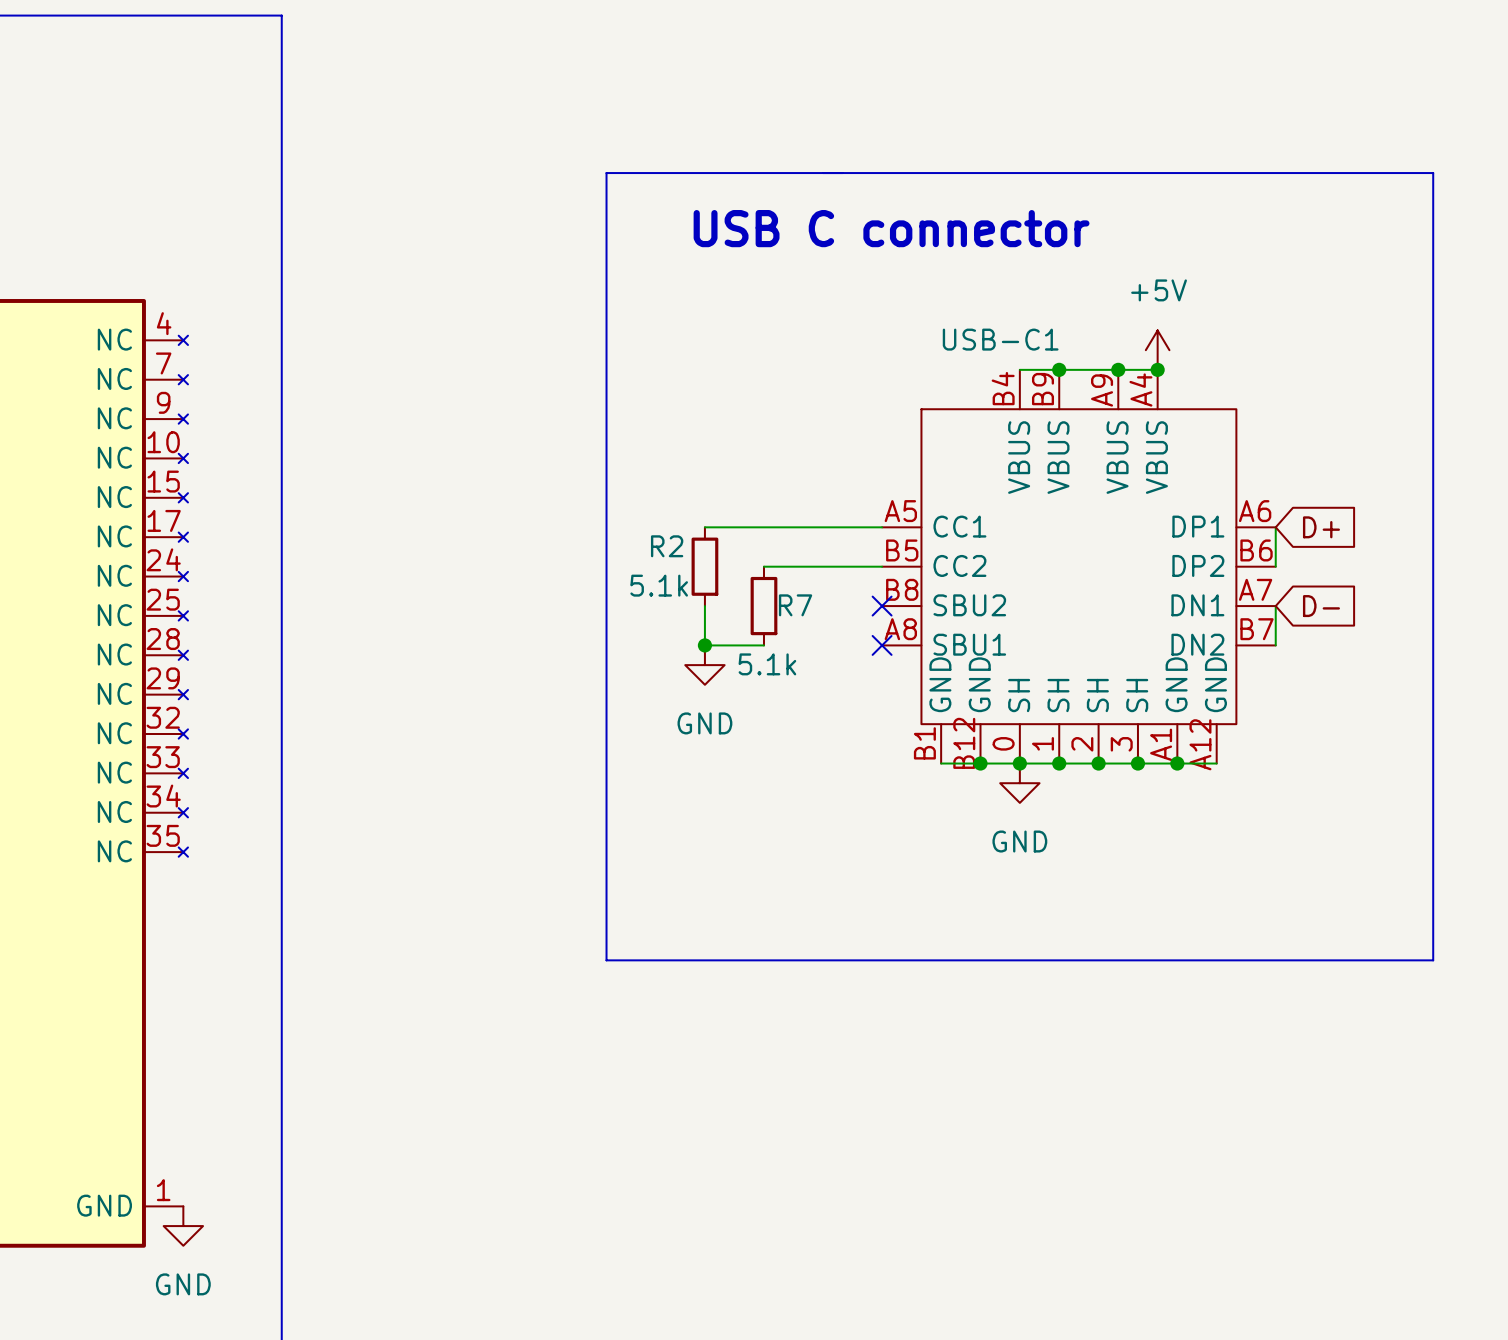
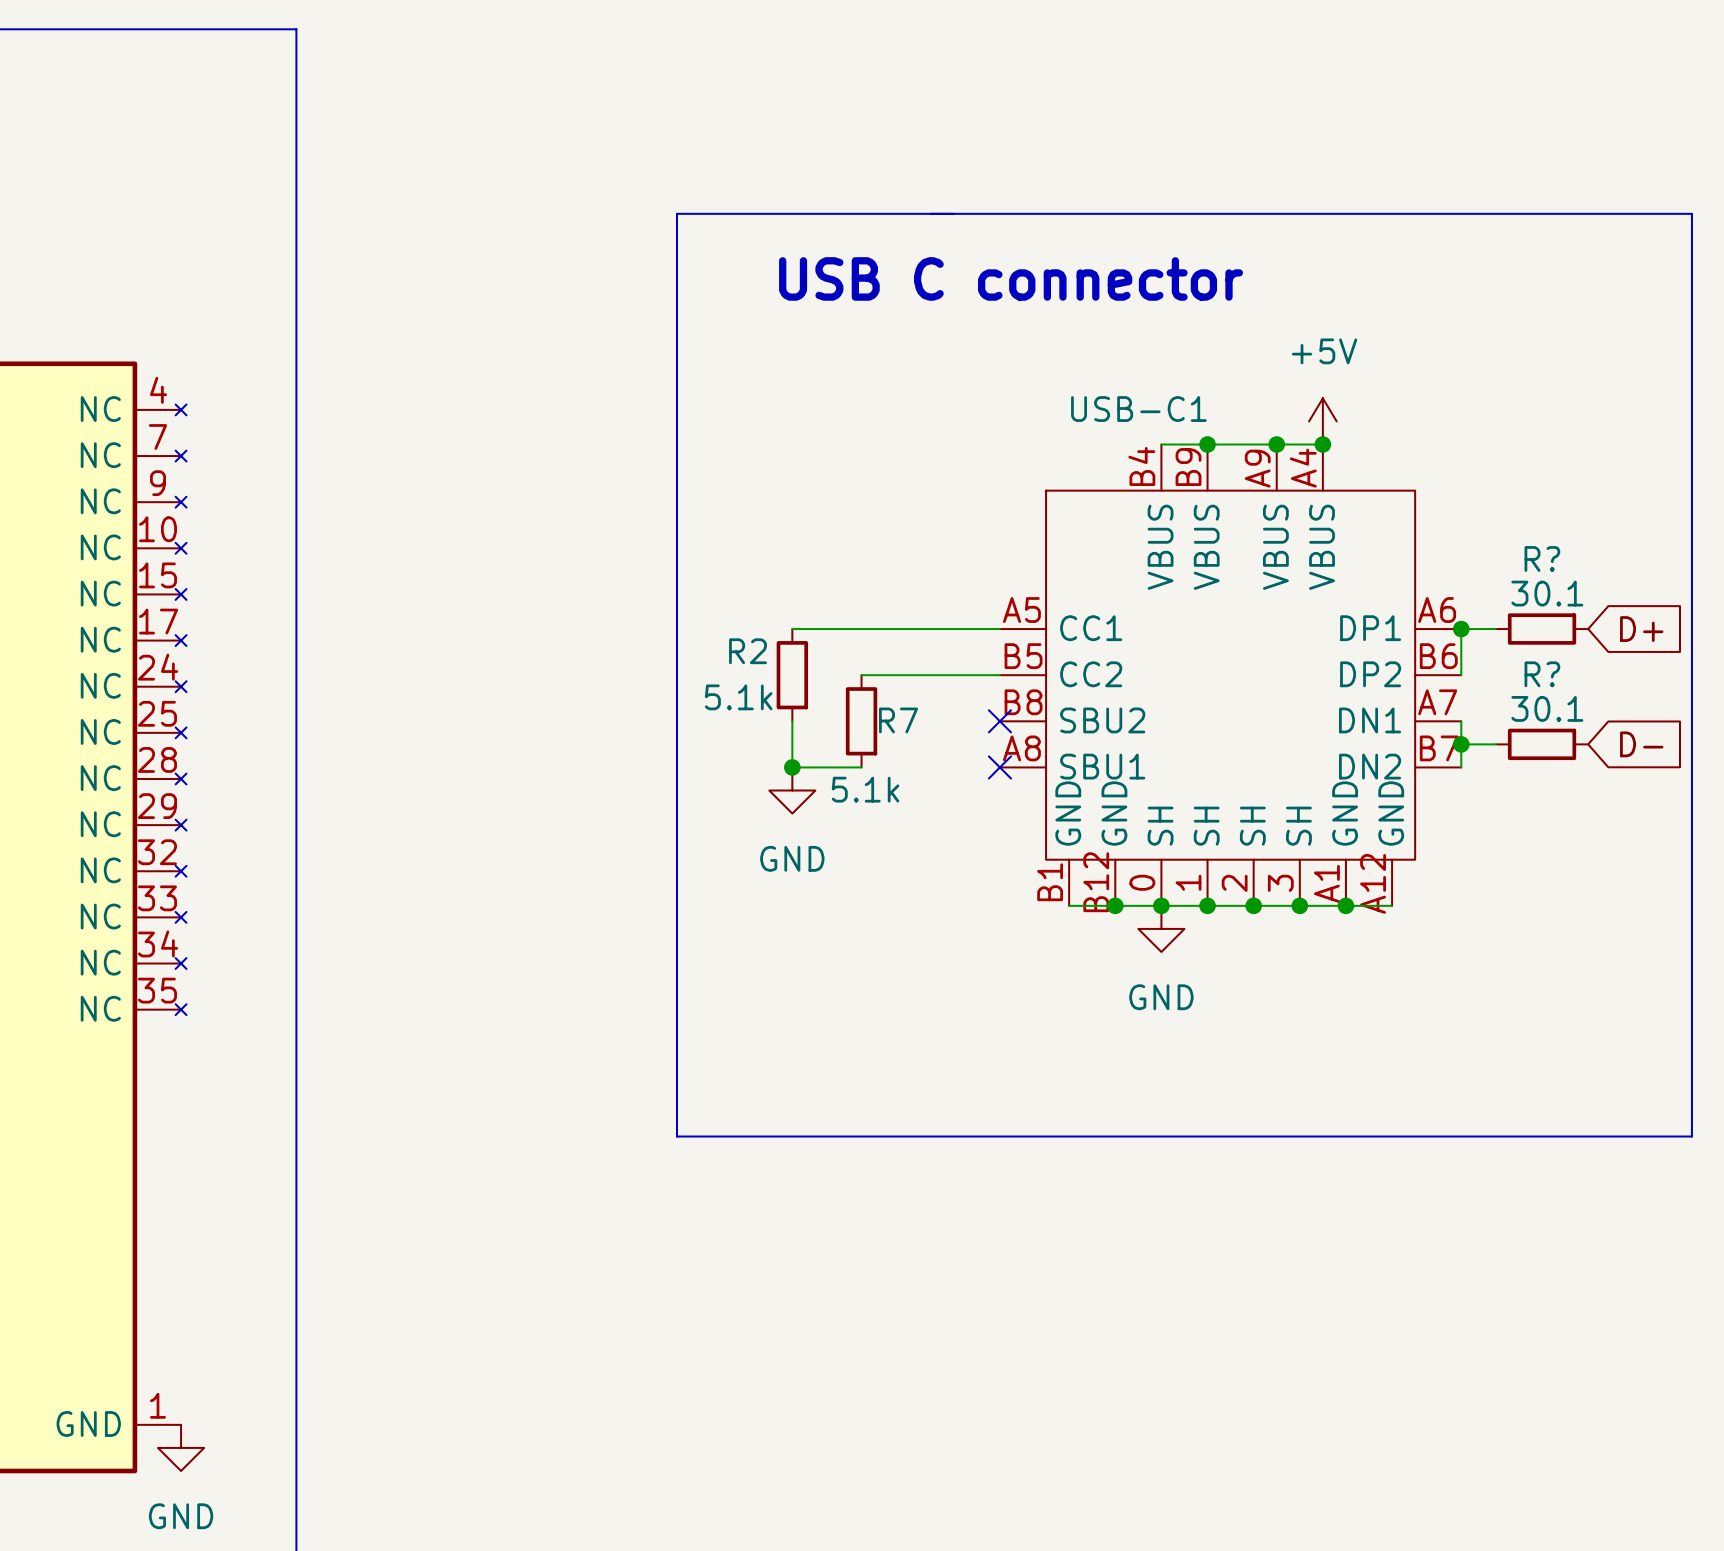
line: (1433, 173) (1433, 960) -> (1645, 213) (1691, 213) (1691, 1136) (1645, 1136)
wire: none -> (1461, 629) (1495, 629)
junction: none -> (1461, 629)
global label position: D+ (1321, 527) -> D+ (1641, 629)
R?: none -> 30.1 (1542, 629)
global label position: D- (1321, 606) -> D- (1641, 744)
wire: none -> (1461, 744) (1495, 744)
junction: none -> (1461, 744)
R?: none -> 30.1 (1542, 744)

